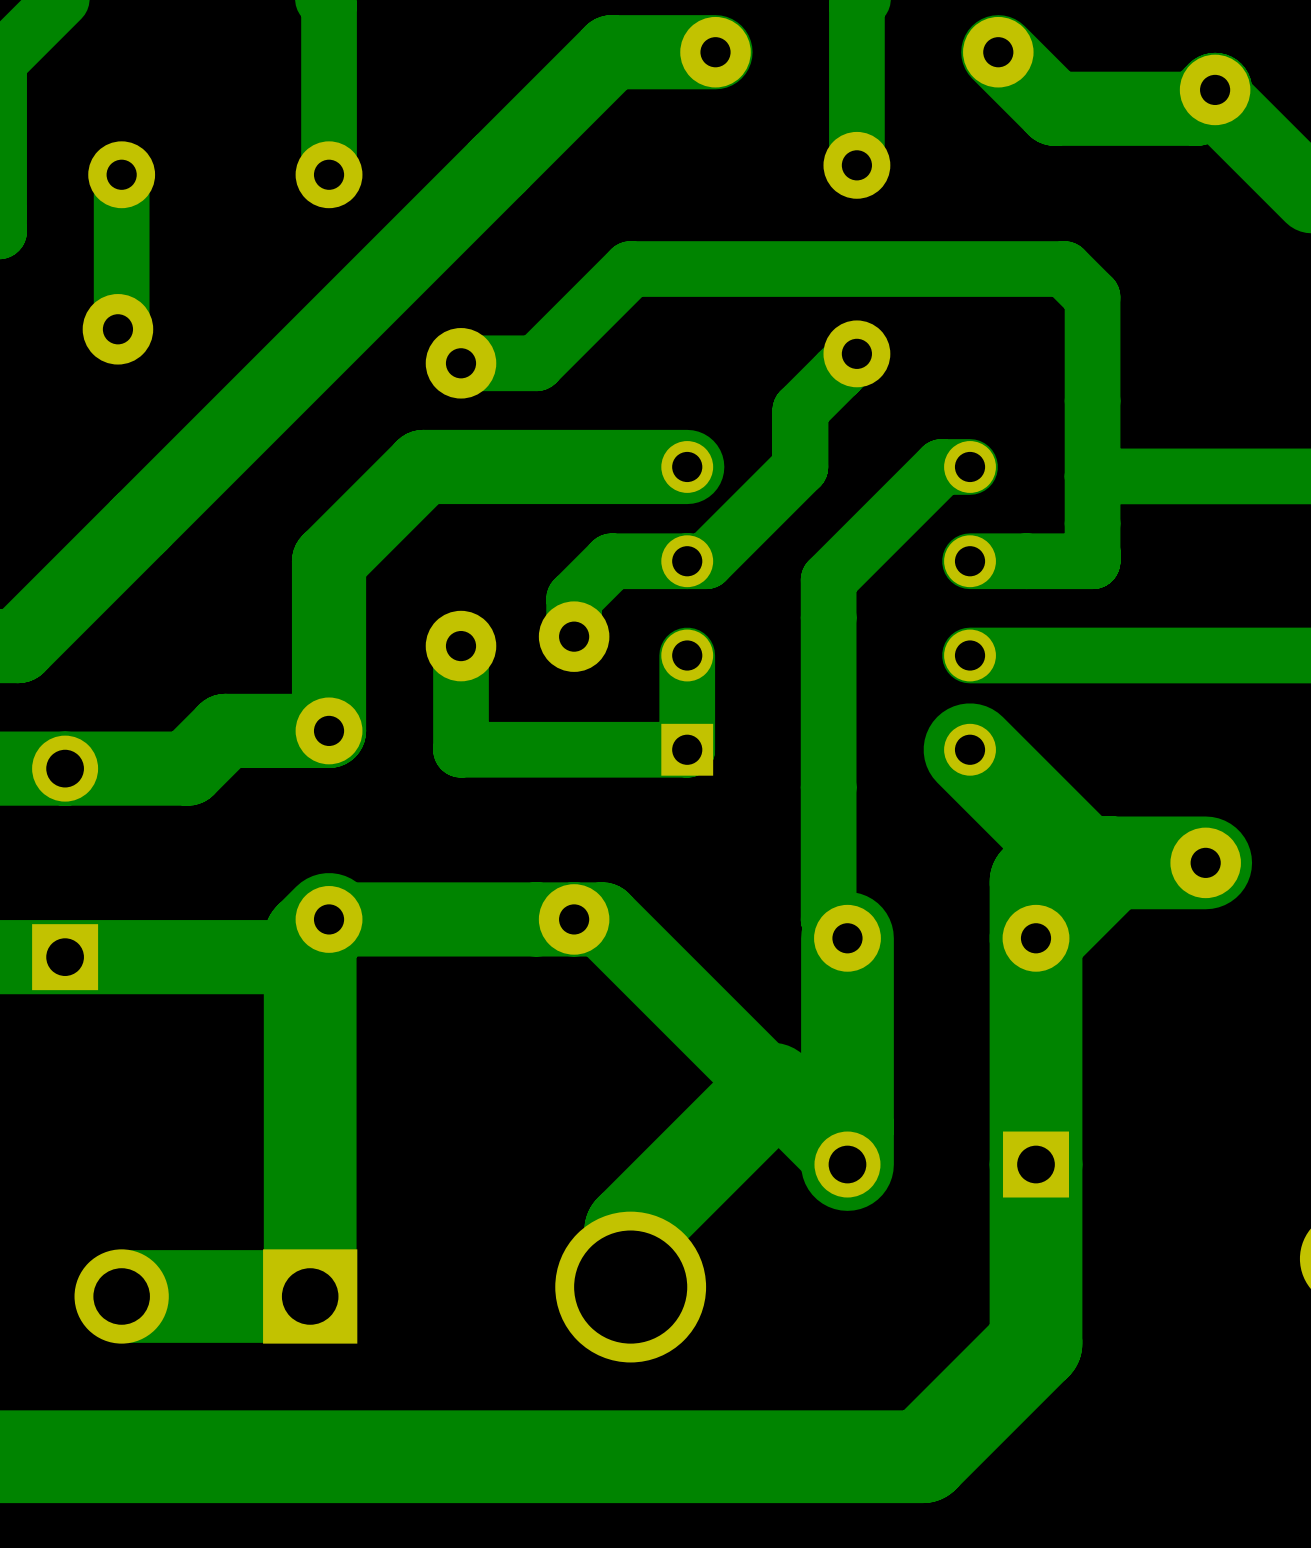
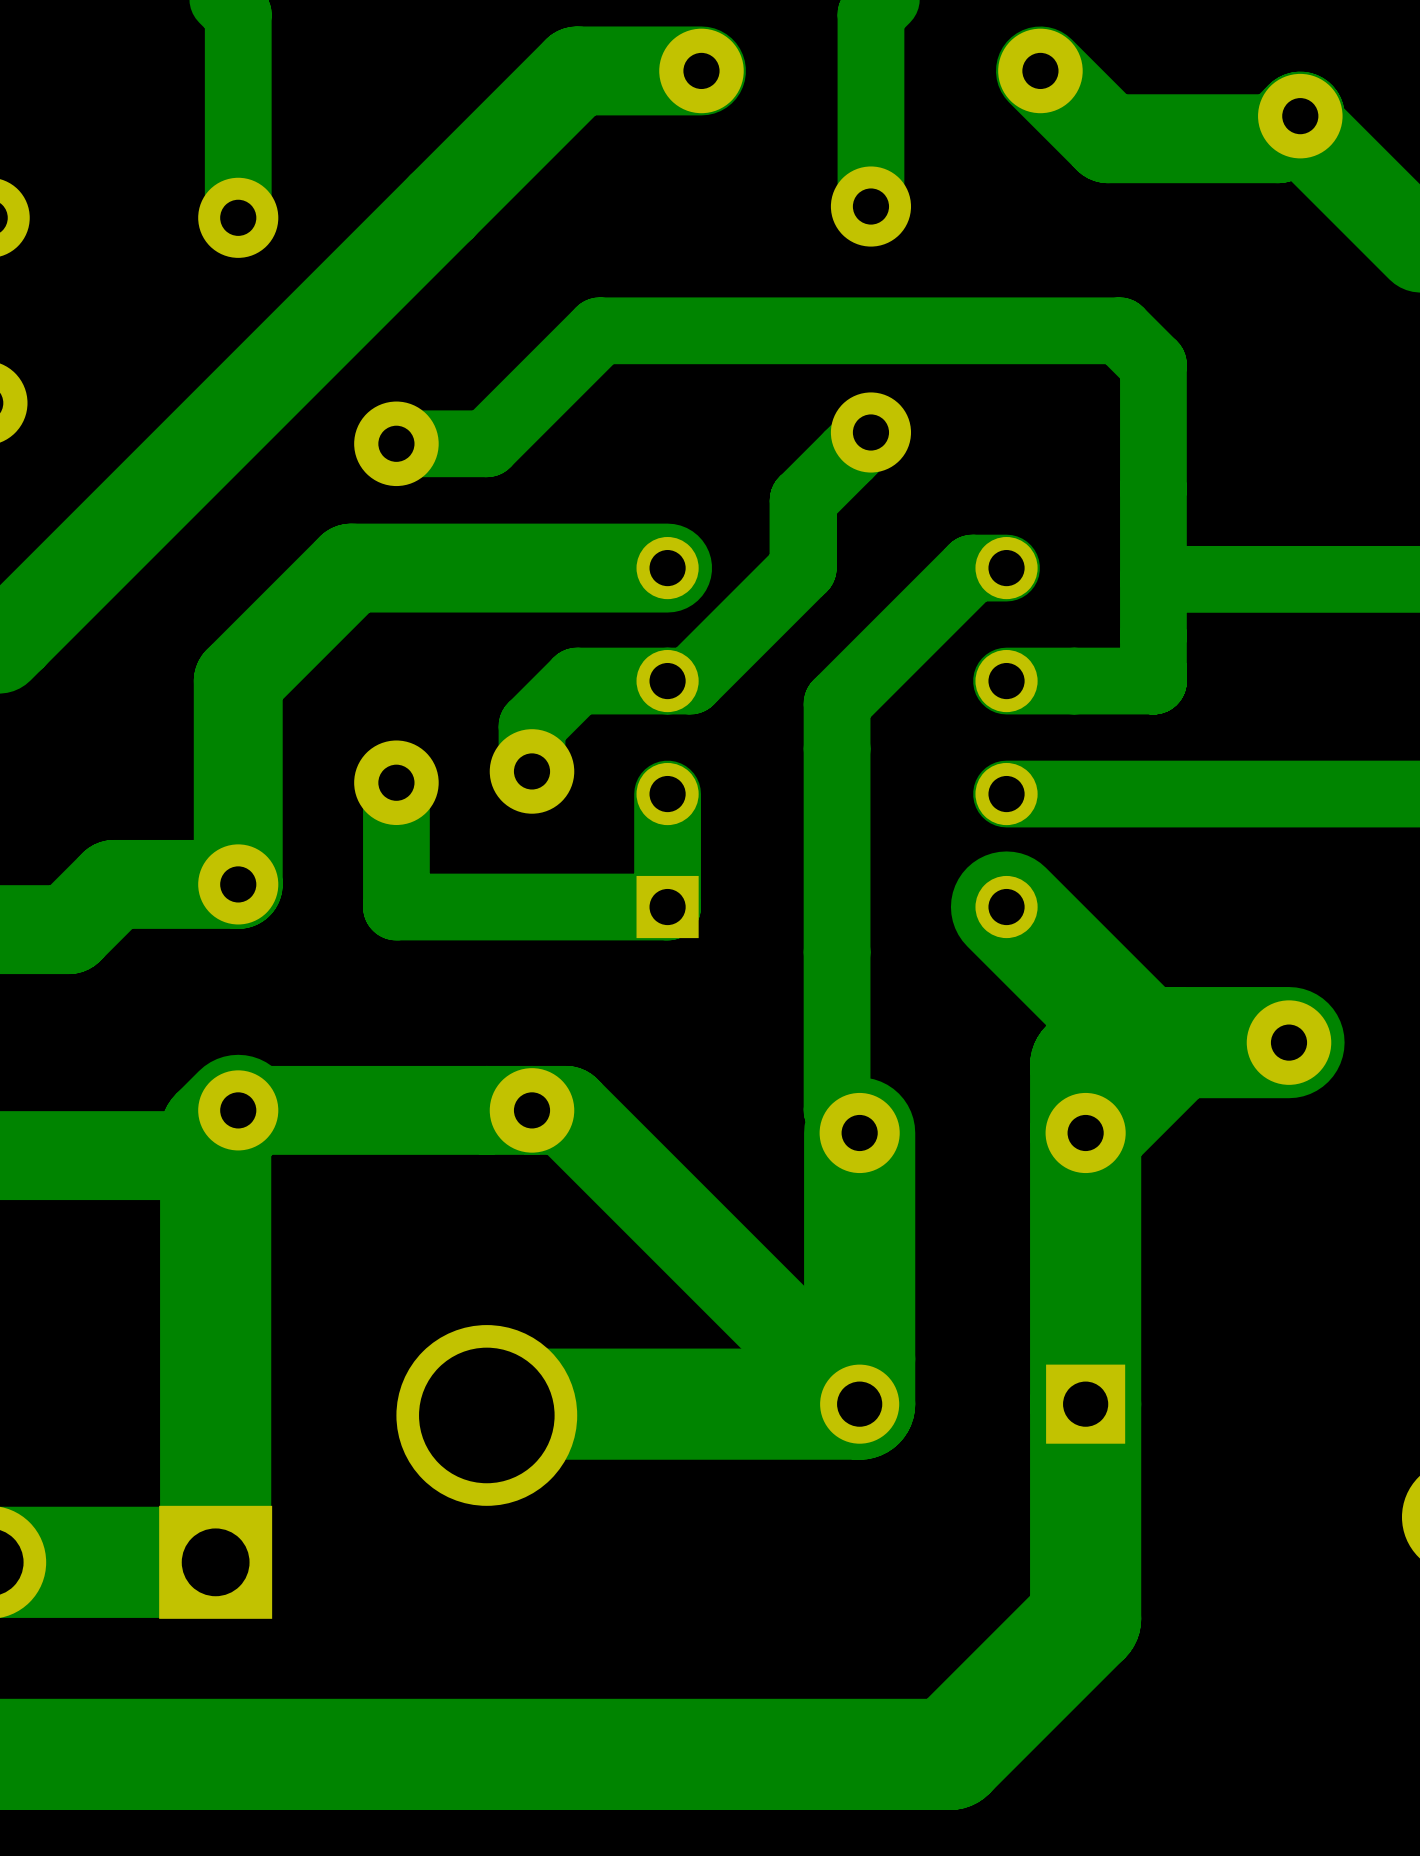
bottom track: (772, 1089) (630, 1230) (630, 1287) -> none
bottom track: none -> (859, 1404) (532, 1404) (486, 1415)
part position: (630, 1287) -> (486, 1415)

